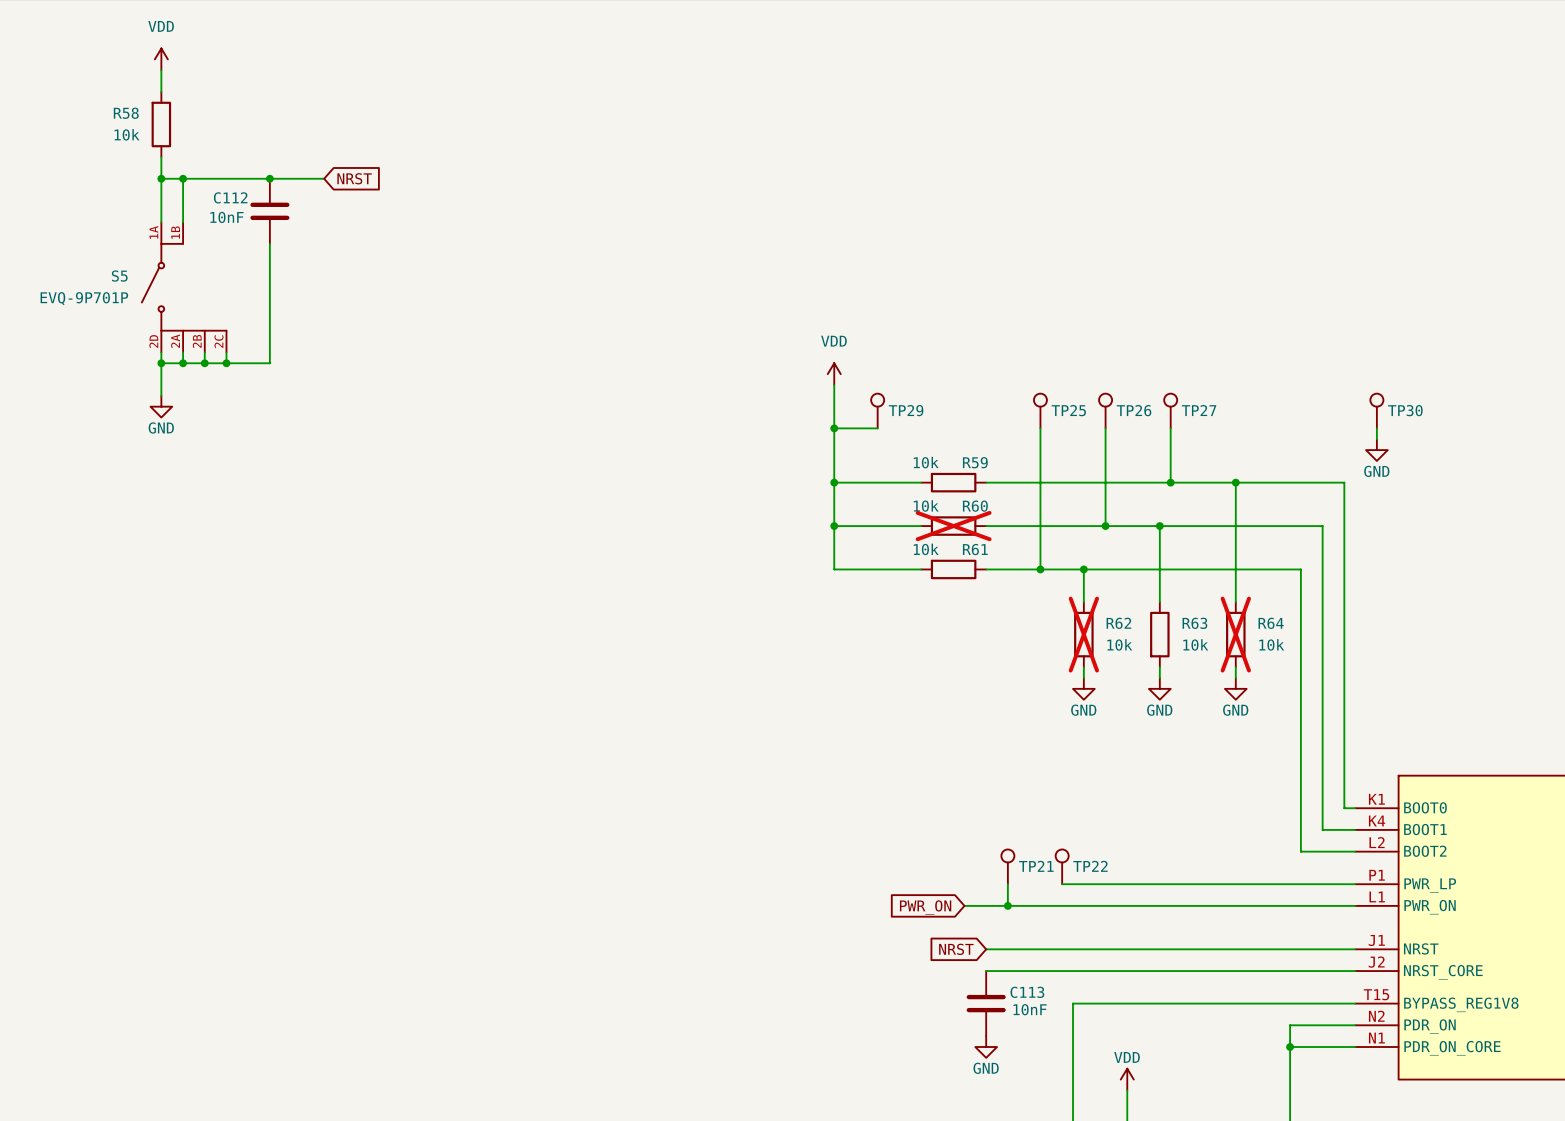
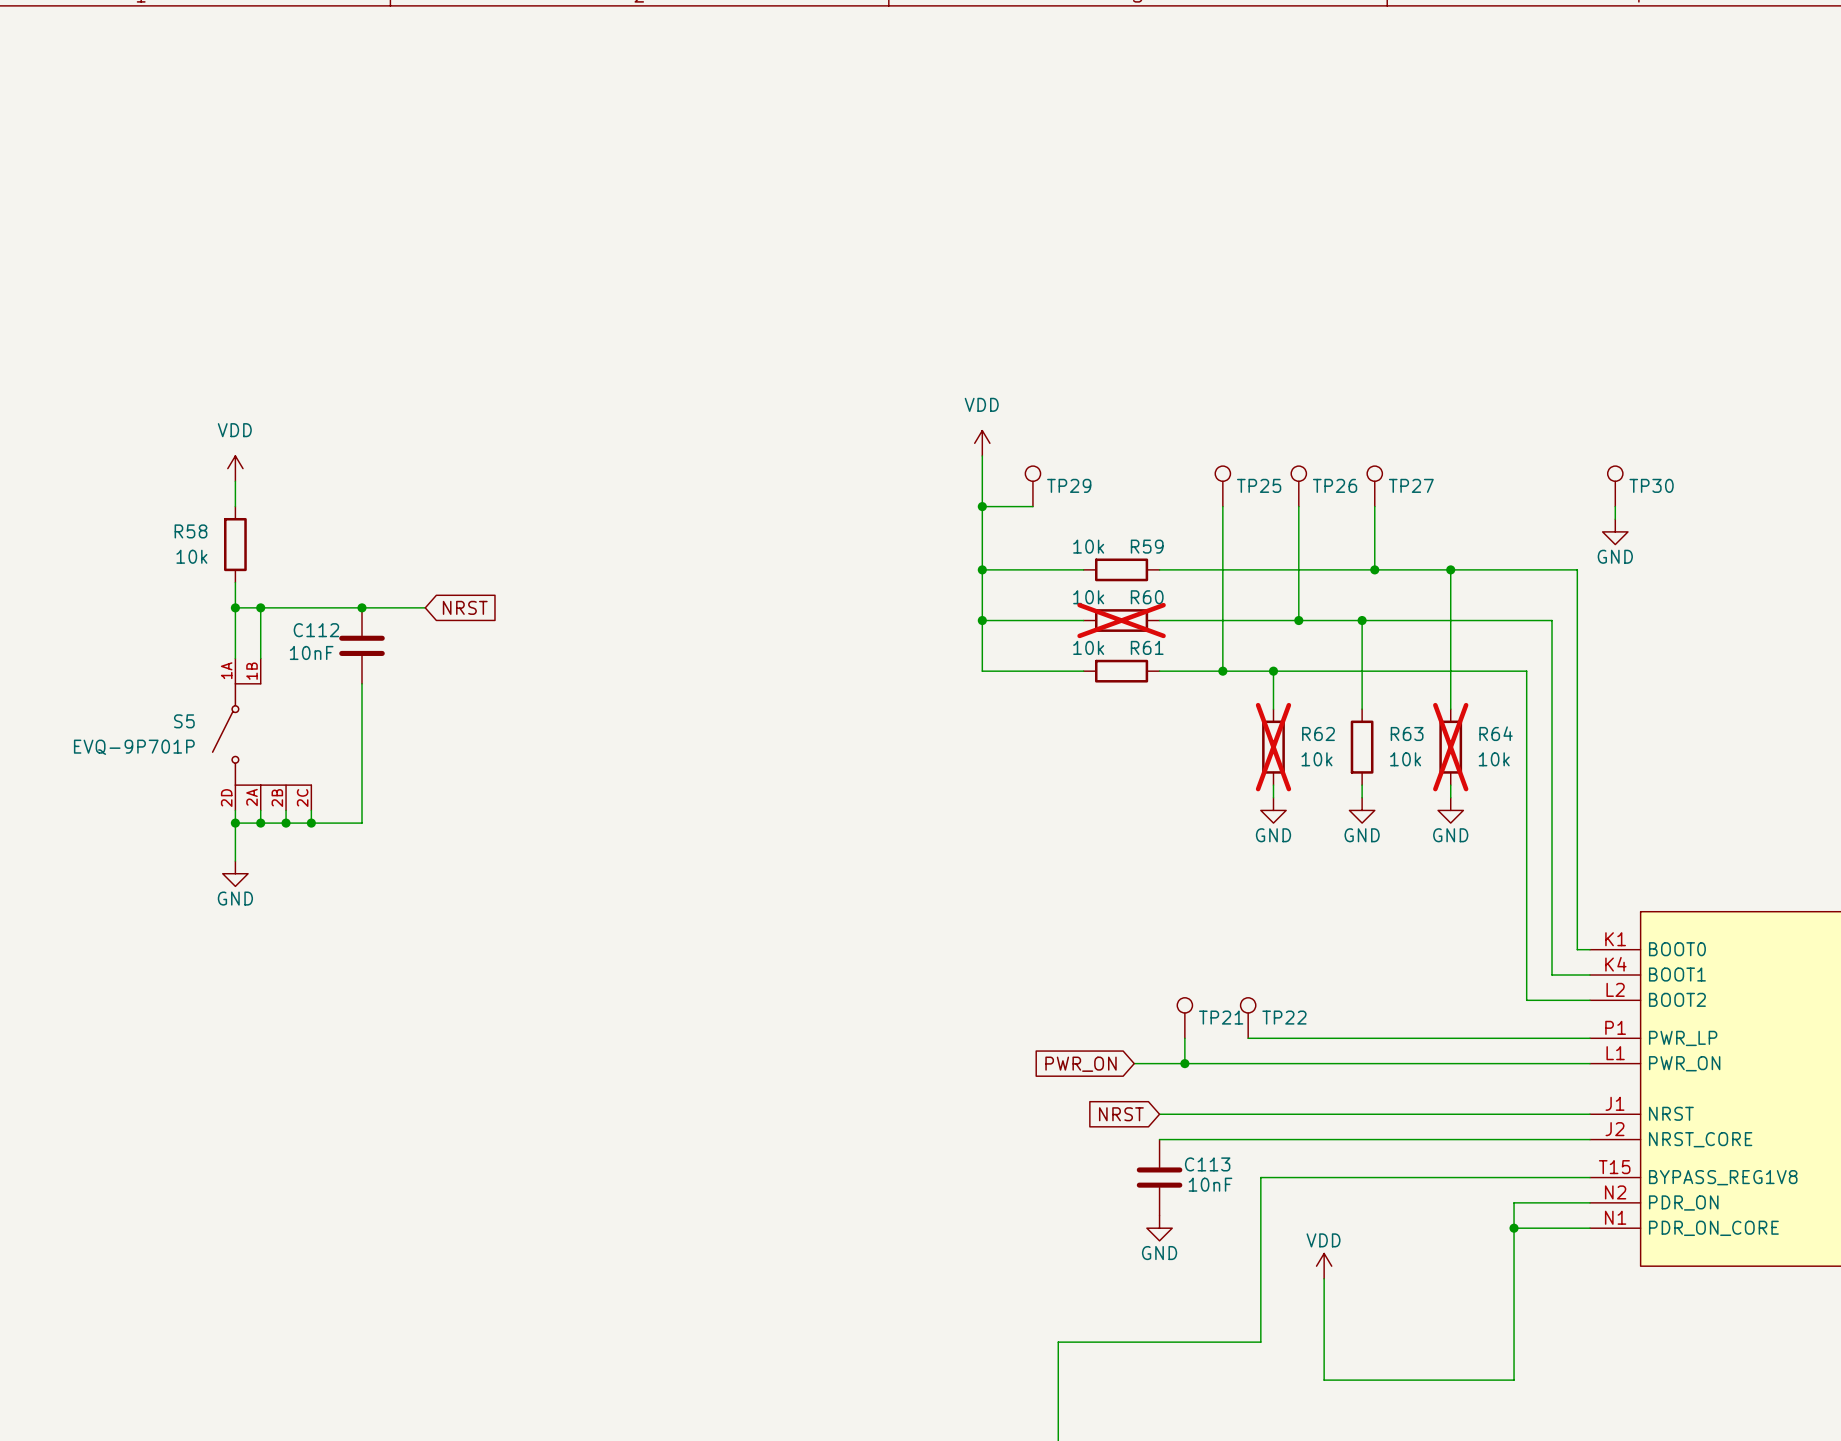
power symbol: VDD (161, 59) -> none
wire: (161, 70) (161, 91) -> none
R58 position: (161, 124) -> (235, 544)
wire: (161, 157) (161, 222) -> none
wire: (161, 178) (324, 178) -> none
junction: (161, 178) -> none
wire: (183, 178) (183, 222) -> none
junction: (183, 178) -> none
junction: (269, 178) -> none
global label: NRST (354, 178) -> none
C112 position: (269, 211) -> (361, 645)
wire: (269, 243) (269, 363) (161, 363) -> none
S5 position: (183, 287) -> (261, 734)
wire: (161, 352) (161, 395) -> (260, 607) (260, 658)
wire: (183, 352) (183, 363) -> none
wire: (204, 352) (204, 363) -> none
wire: (226, 352) (226, 363) -> none
junction: (161, 363) -> none
junction: (183, 363) -> none
junction: (204, 363) -> none
junction: (226, 363) -> none
power symbol: none -> VDD (235, 468)
power symbol: GND (161, 406) -> none
wire: none -> (235, 481) (235, 506)
wire: none -> (235, 582) (235, 658)
wire: none -> (235, 607) (425, 607)
junction: none -> (235, 607)
junction: none -> (260, 607)
junction: none -> (361, 607)
global label: none -> NRST (465, 607)
wire: none -> (361, 683) (361, 823) (235, 823)
wire: none -> (235, 810) (235, 861)
wire: none -> (260, 810) (260, 823)
wire: none -> (286, 810) (286, 823)
wire: none -> (311, 810) (311, 823)
junction: none -> (235, 823)
junction: none -> (260, 823)
junction: none -> (286, 823)
junction: none -> (311, 823)
power symbol: none -> GND (235, 873)

